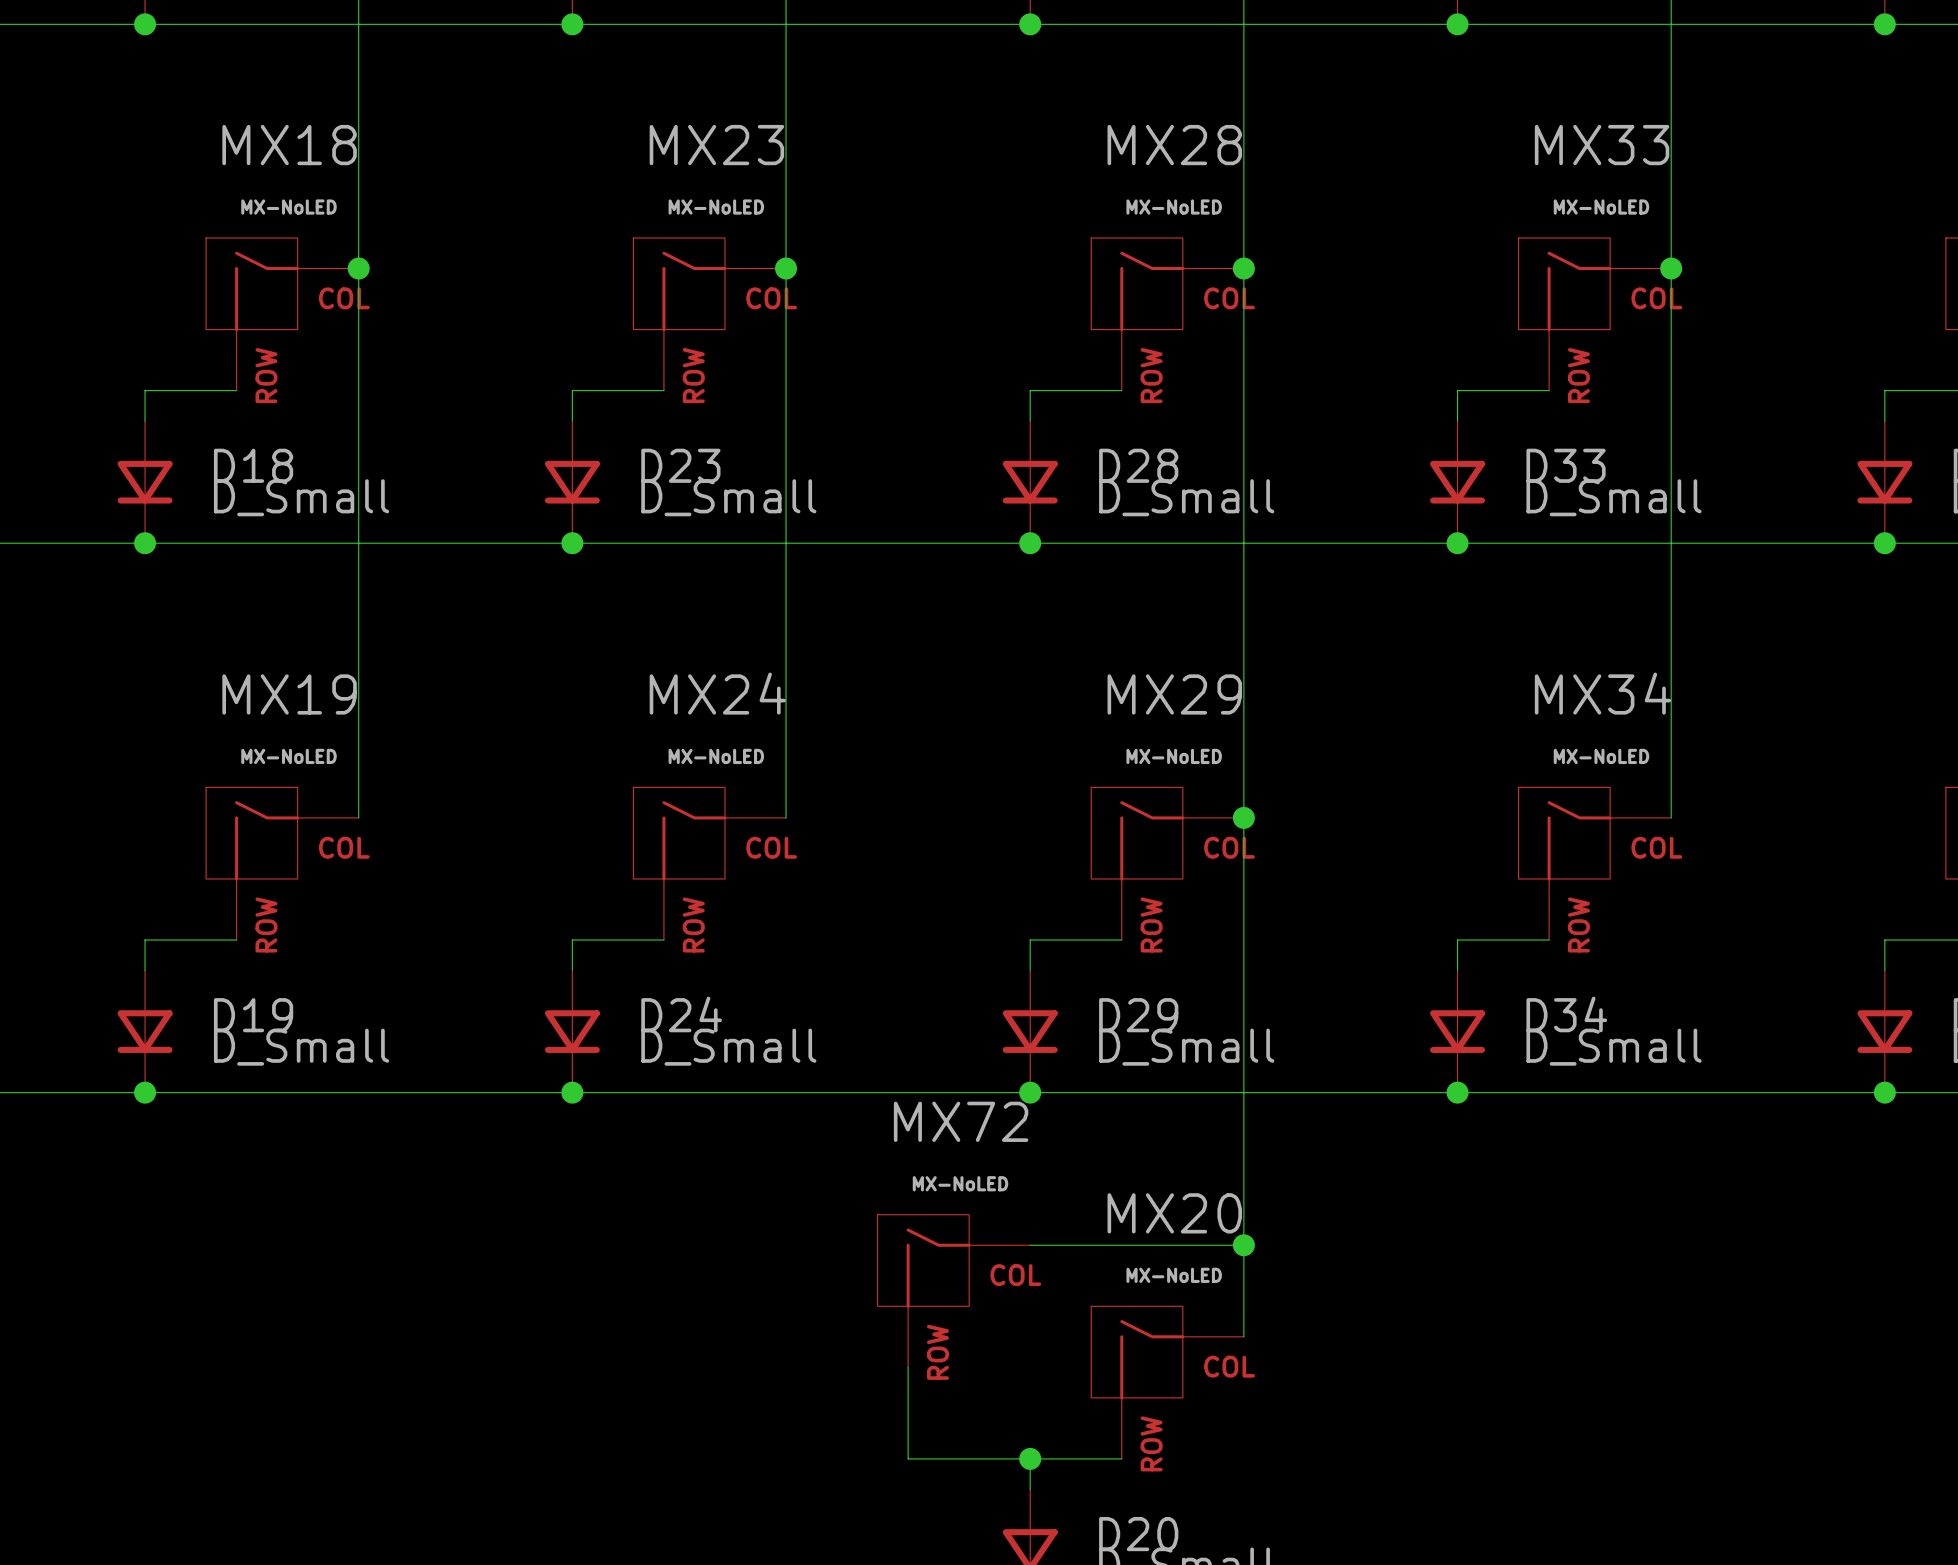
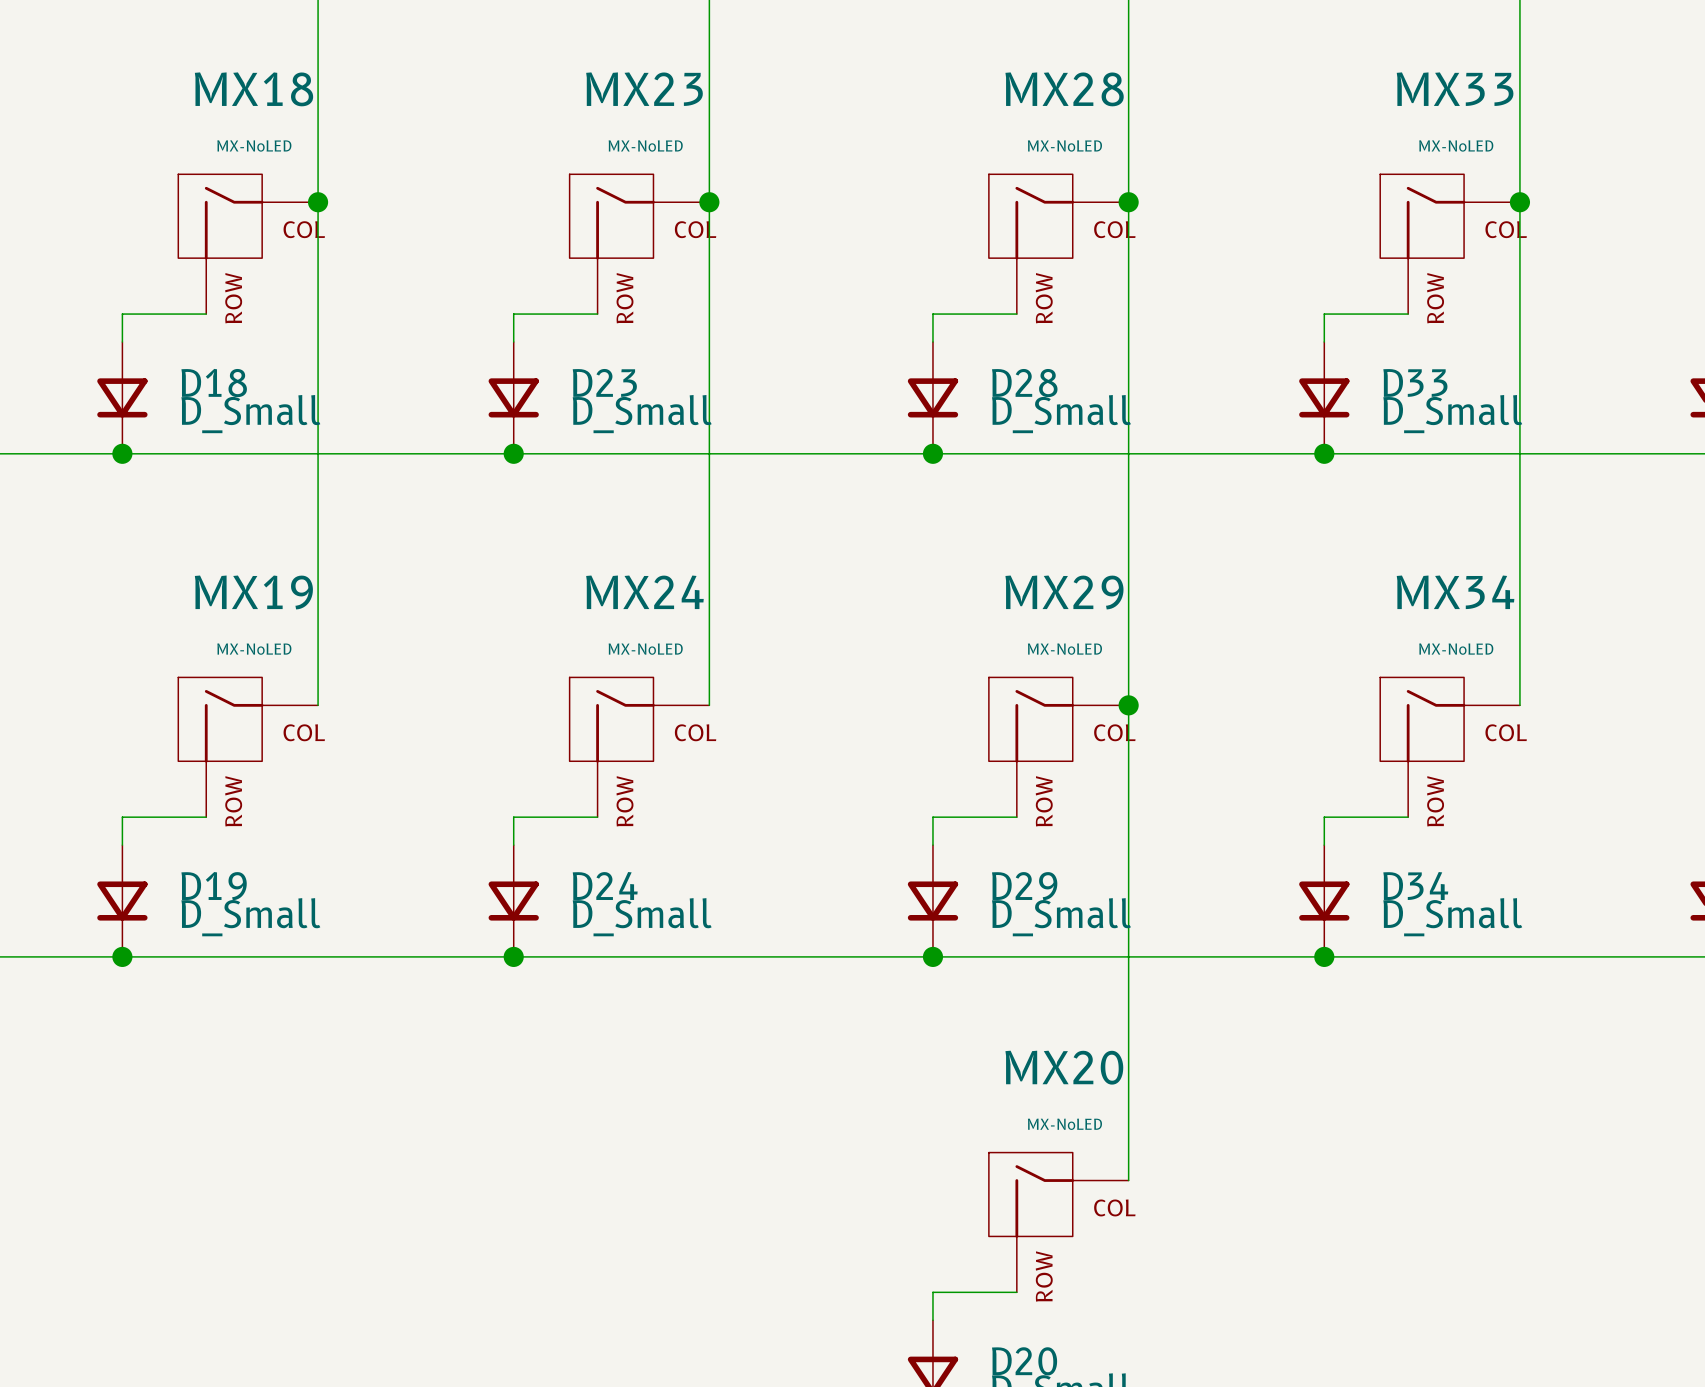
wire: (1030, 1245) (1243, 1245) -> none
junction: (1243, 1245) -> none
MX72: MX-NoLED (953, 1291) -> none
wire: (908, 1367) (908, 1458) (1030, 1458) -> none
junction: (1030, 1458) -> none

